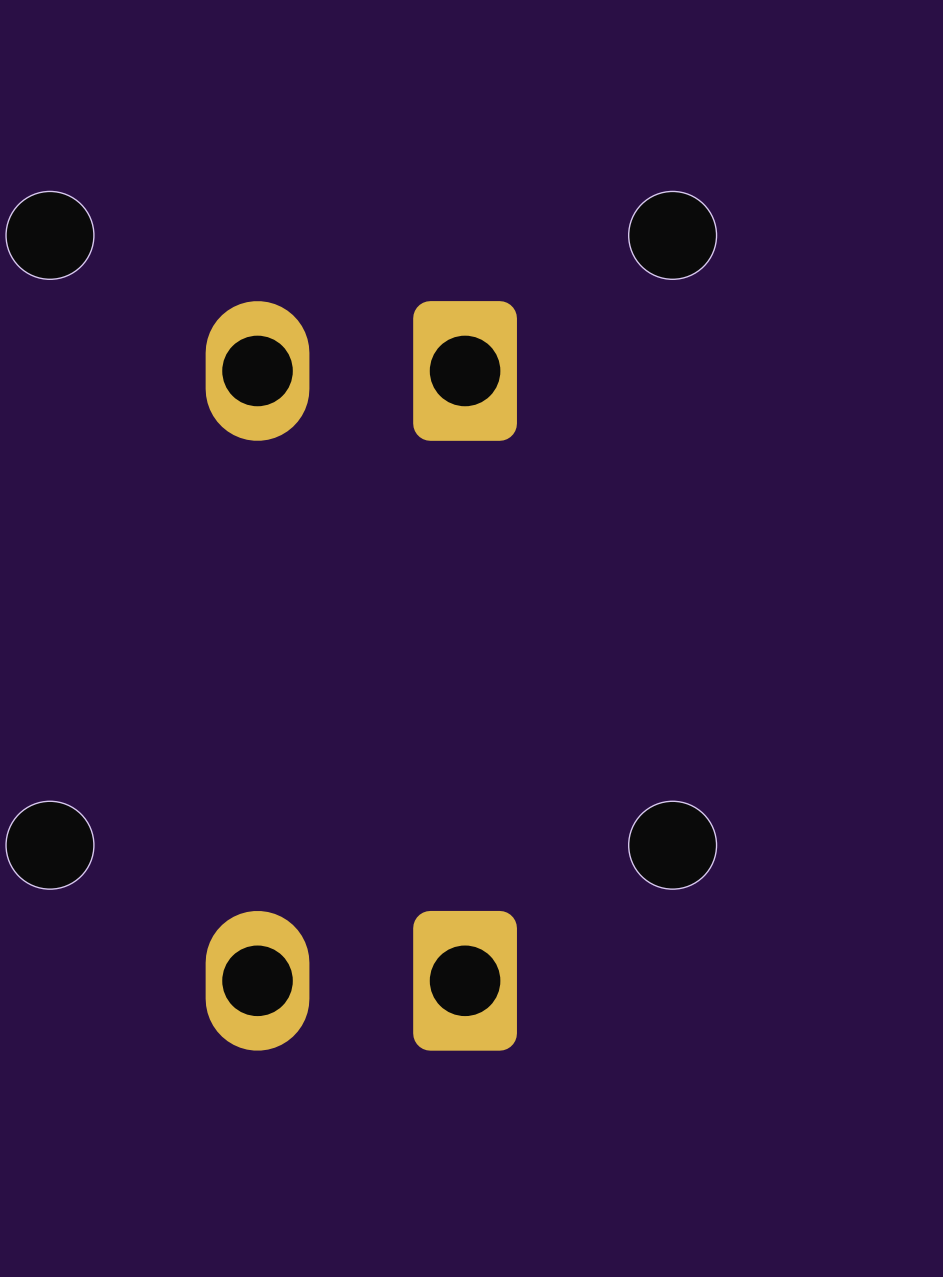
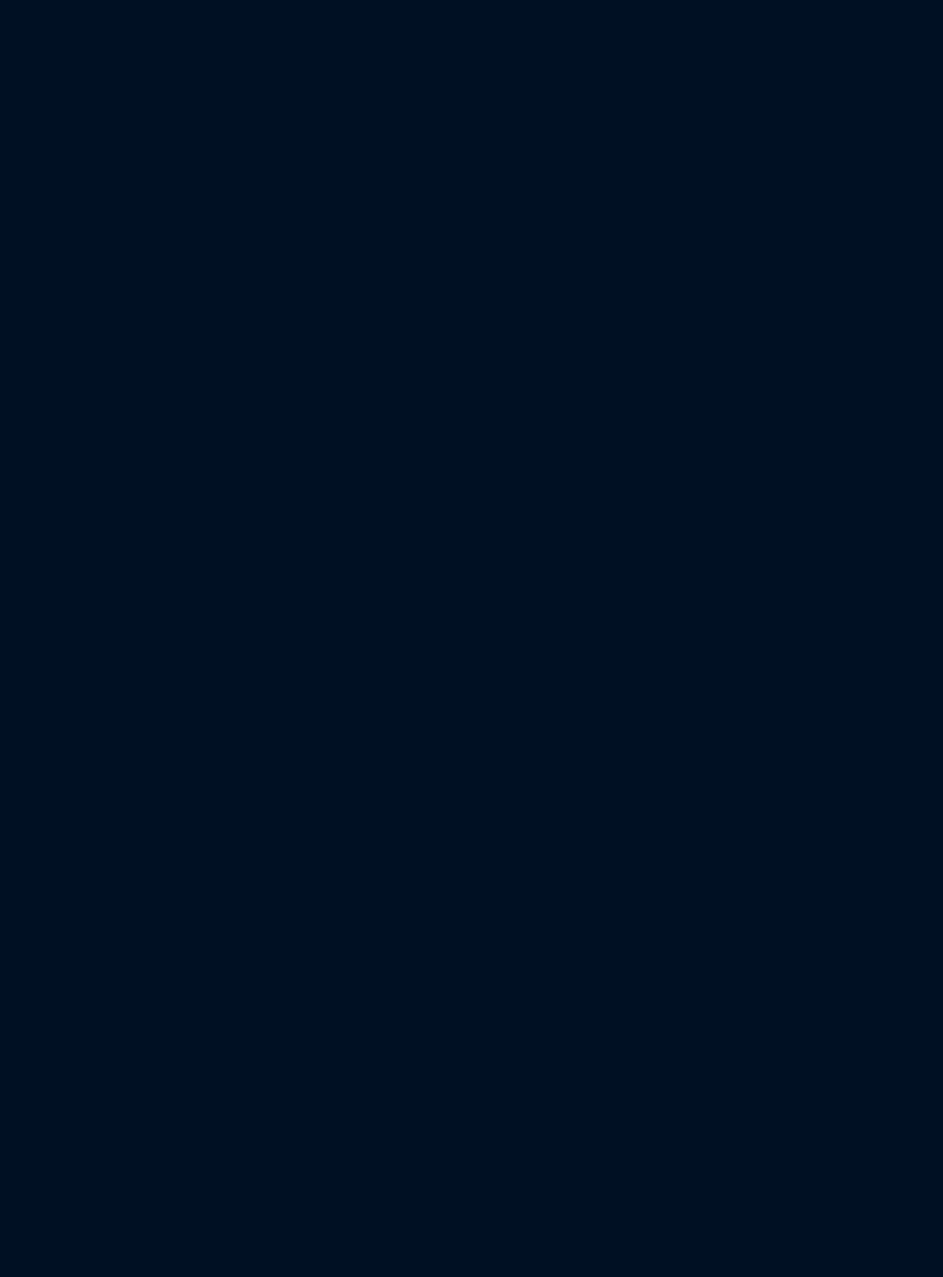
part: (361, 316) -> none
part: (361, 925) -> none

